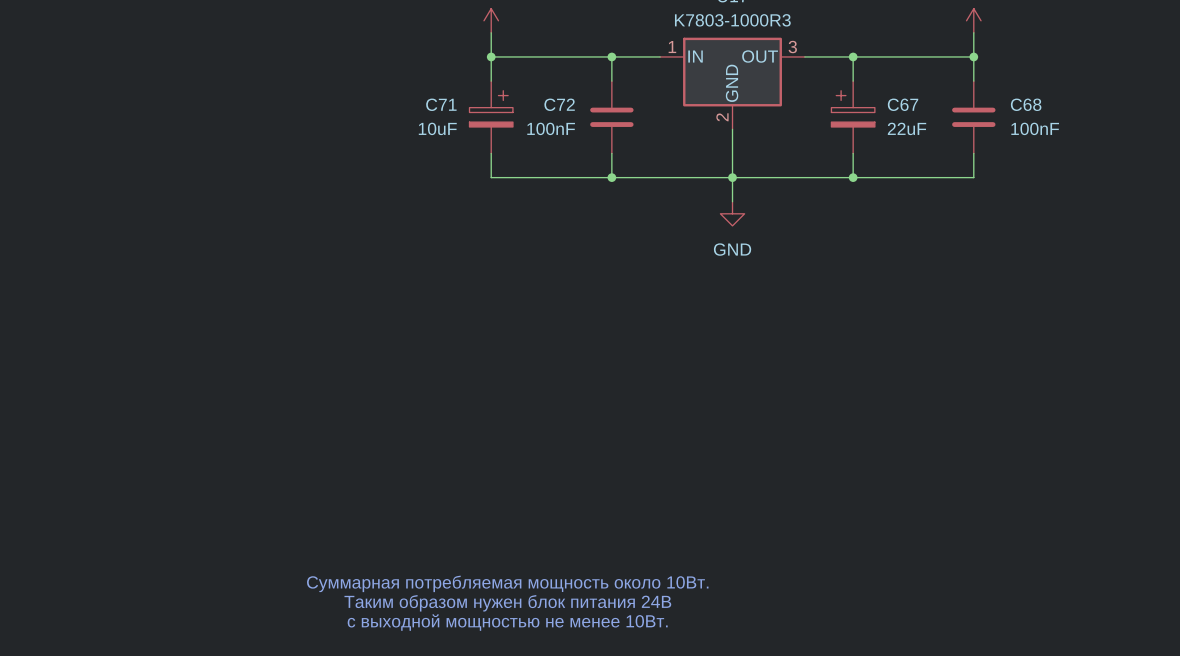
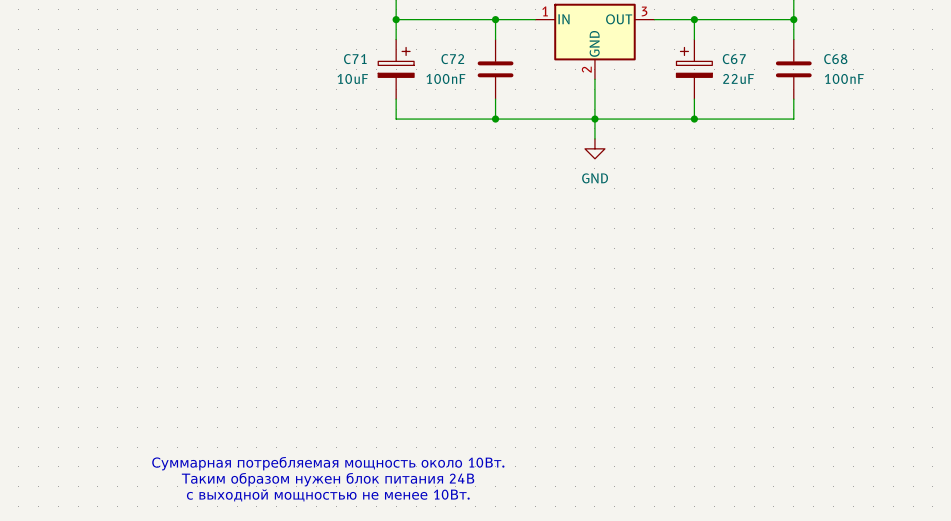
text position: Суммарная потребляемая мощность около 10Вт. (507, 583) -> Суммарная потребляемая мощность около 10Вт. (328, 463)
text position: Таким образом нужен блок питания 24В (507, 603) -> Таким образом нужен блок питания 24В (328, 479)
text position: с выходной мощностью не менее 10Вт. (507, 622) -> с выходной мощностью не менее 10Вт. (328, 495)

